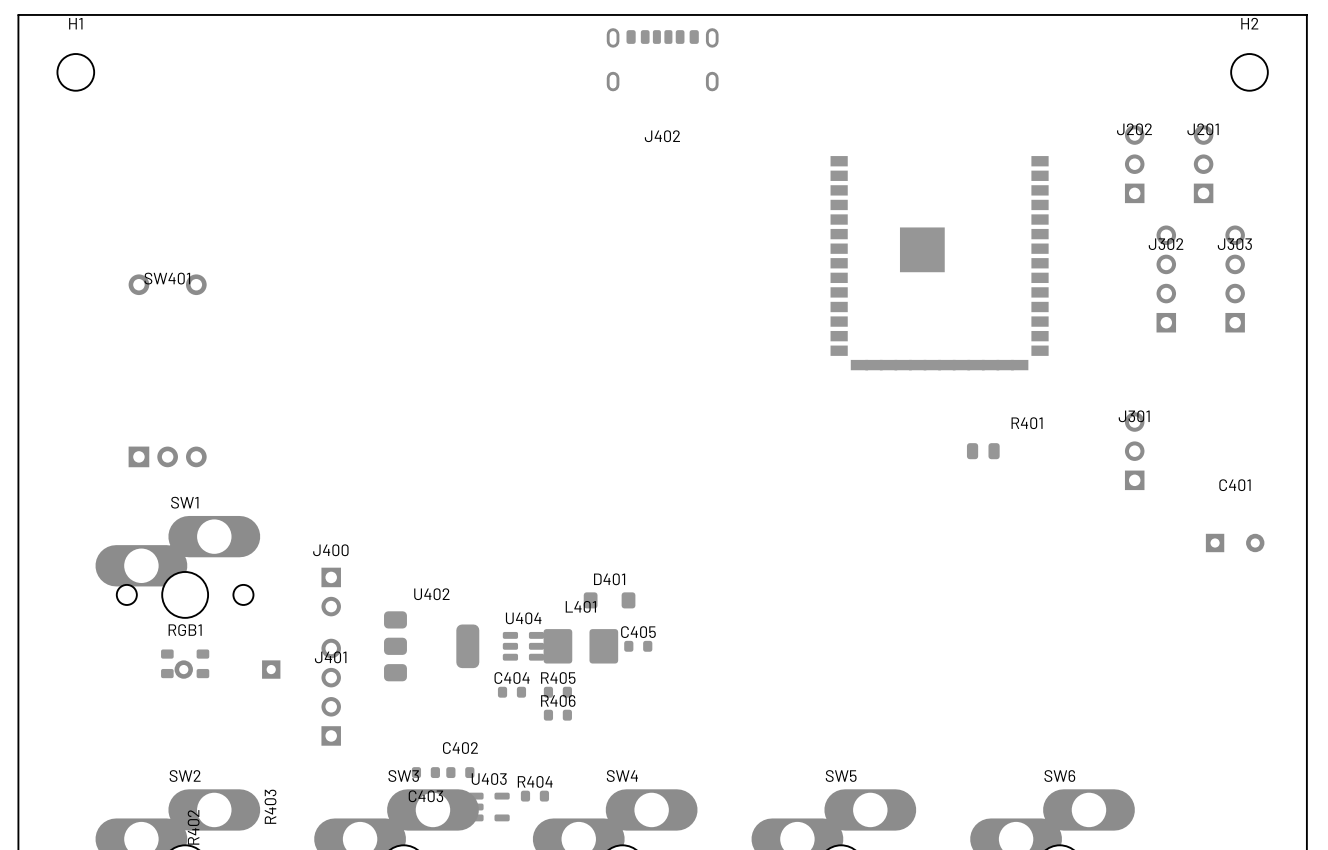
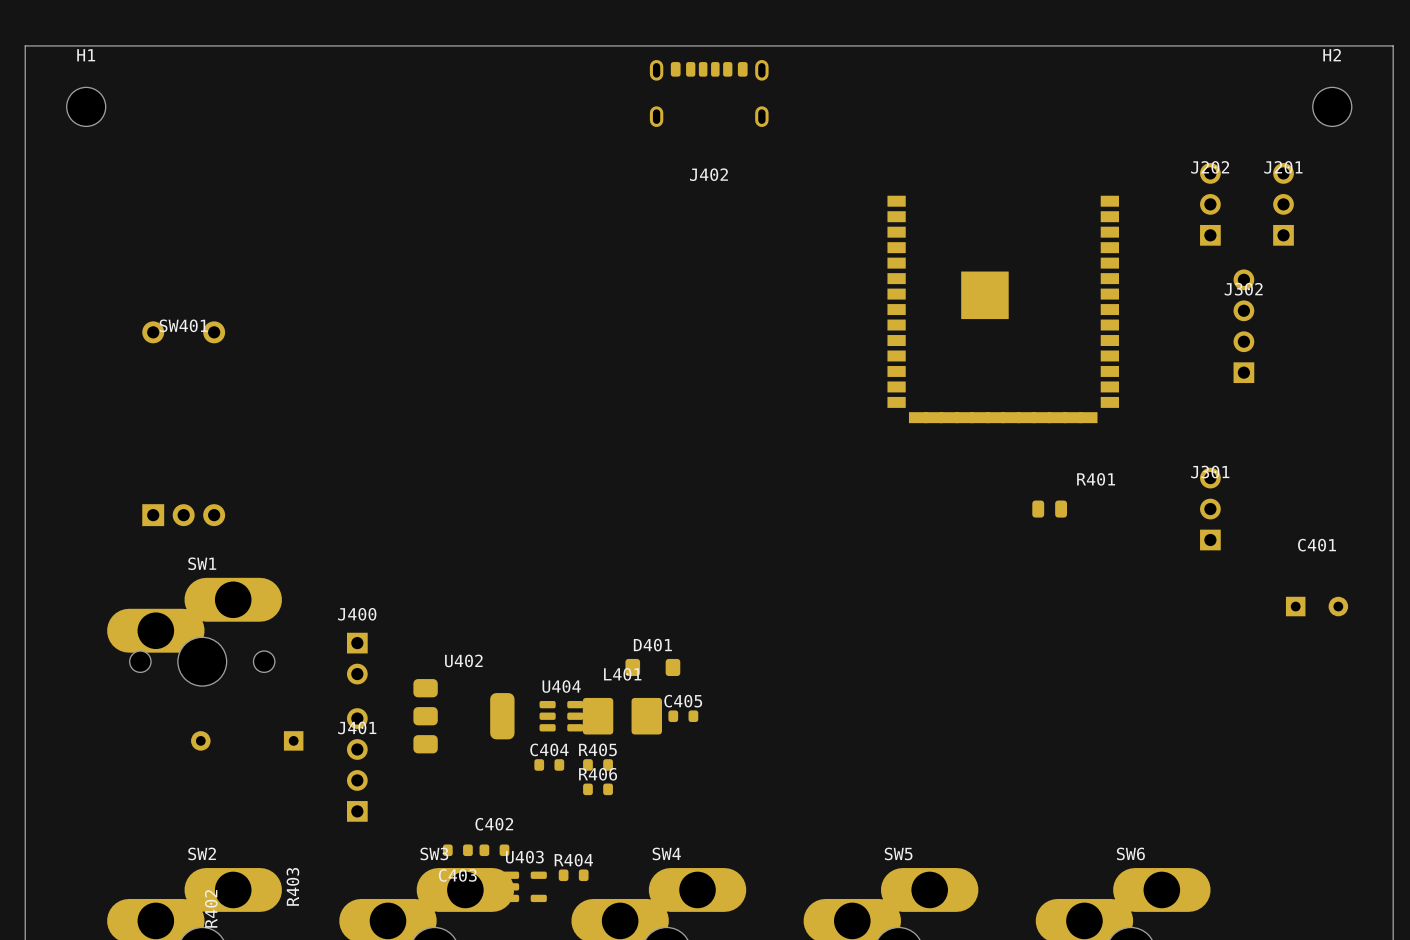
J303: (1235, 278) -> none
RGB1: (185, 663) -> none

